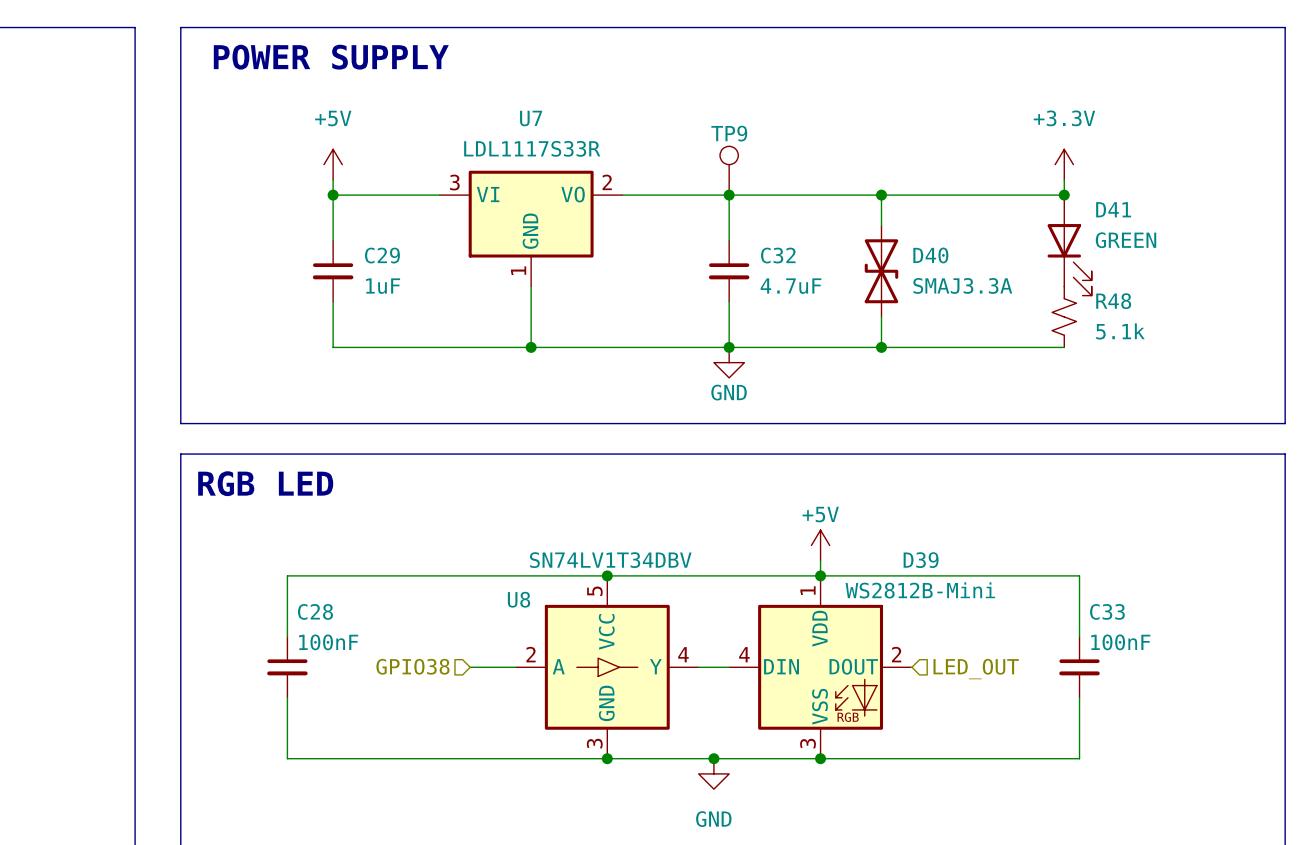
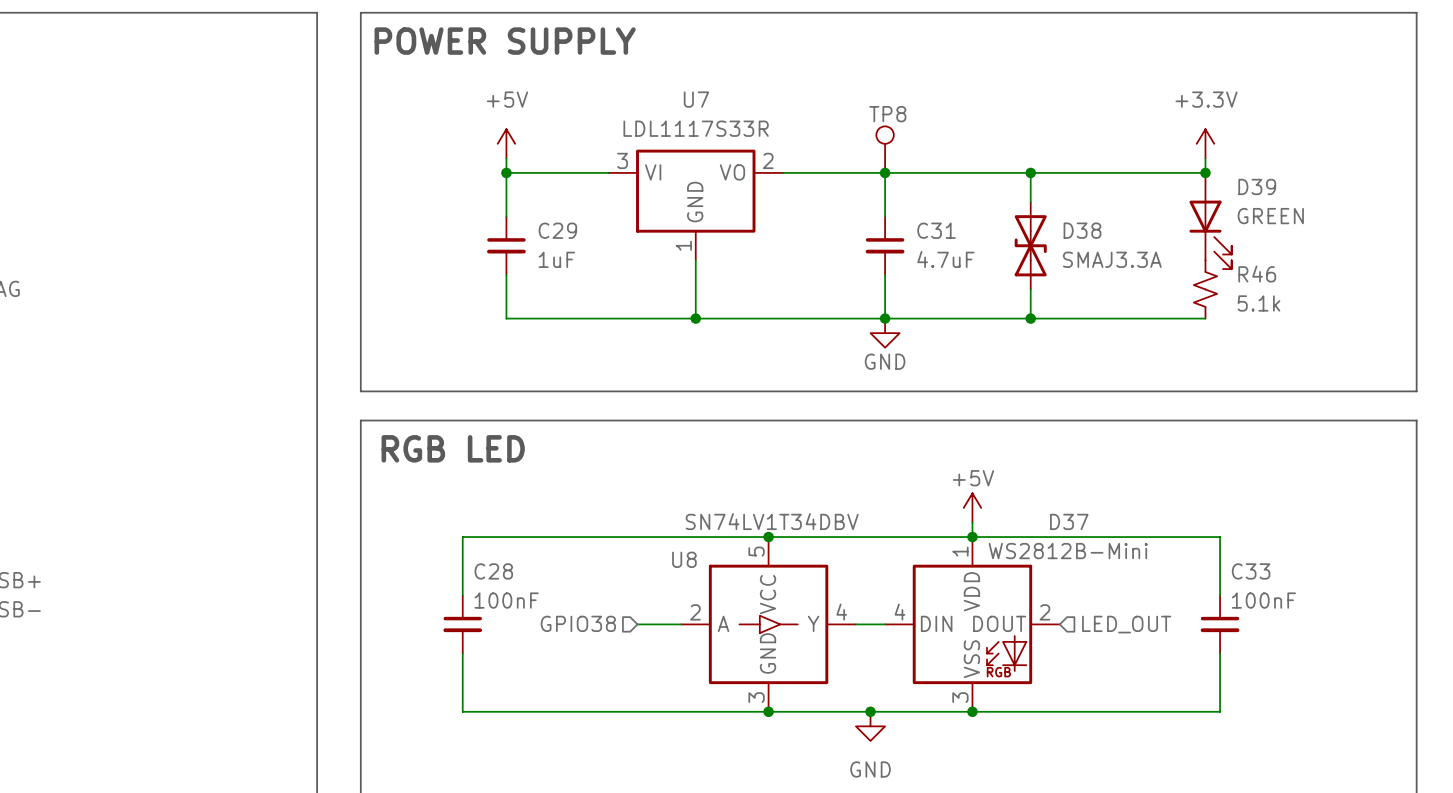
TP9 name: TP9 (729, 133) -> TP8 (887, 114)
D41 name: D41 (1113, 209) -> D39 (1257, 186)
C32 name: C32 (778, 255) -> C31 (936, 230)
D40 name: D40 (930, 255) -> D38 (1082, 230)
R48 name: R48 (1113, 301) -> R46 (1257, 274)
D39 name: D39 (921, 560) -> D37 (1069, 521)

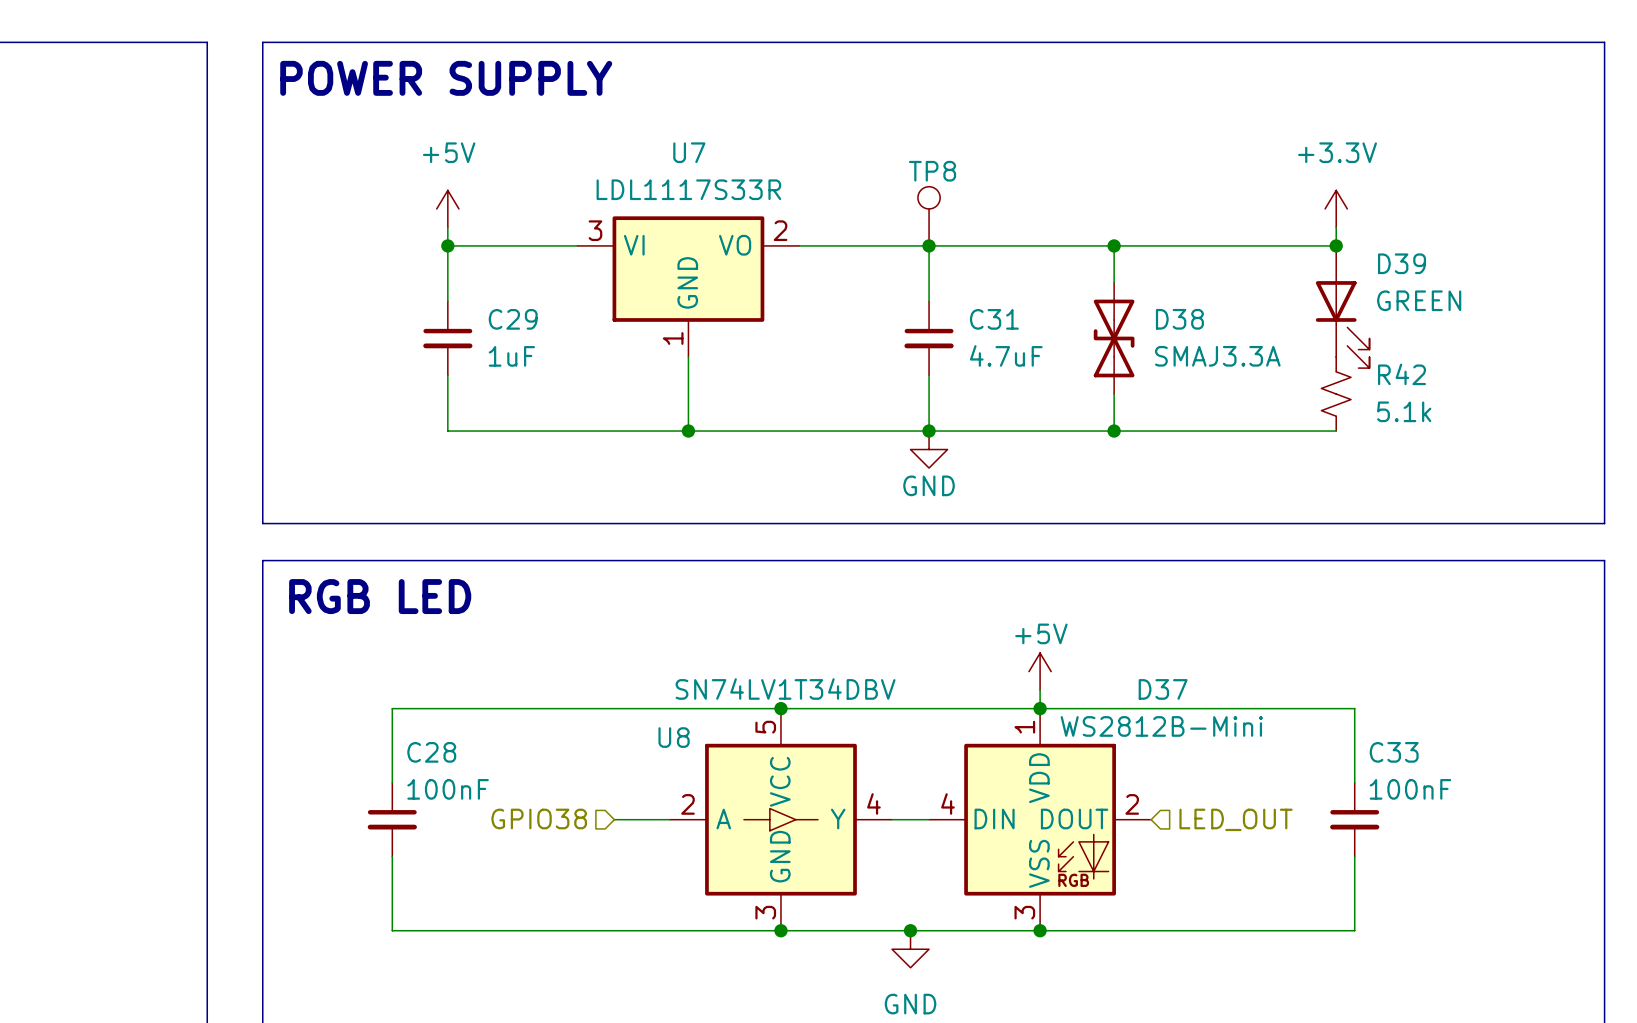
R46 name: R46 (1257, 274) -> R42 (1402, 374)

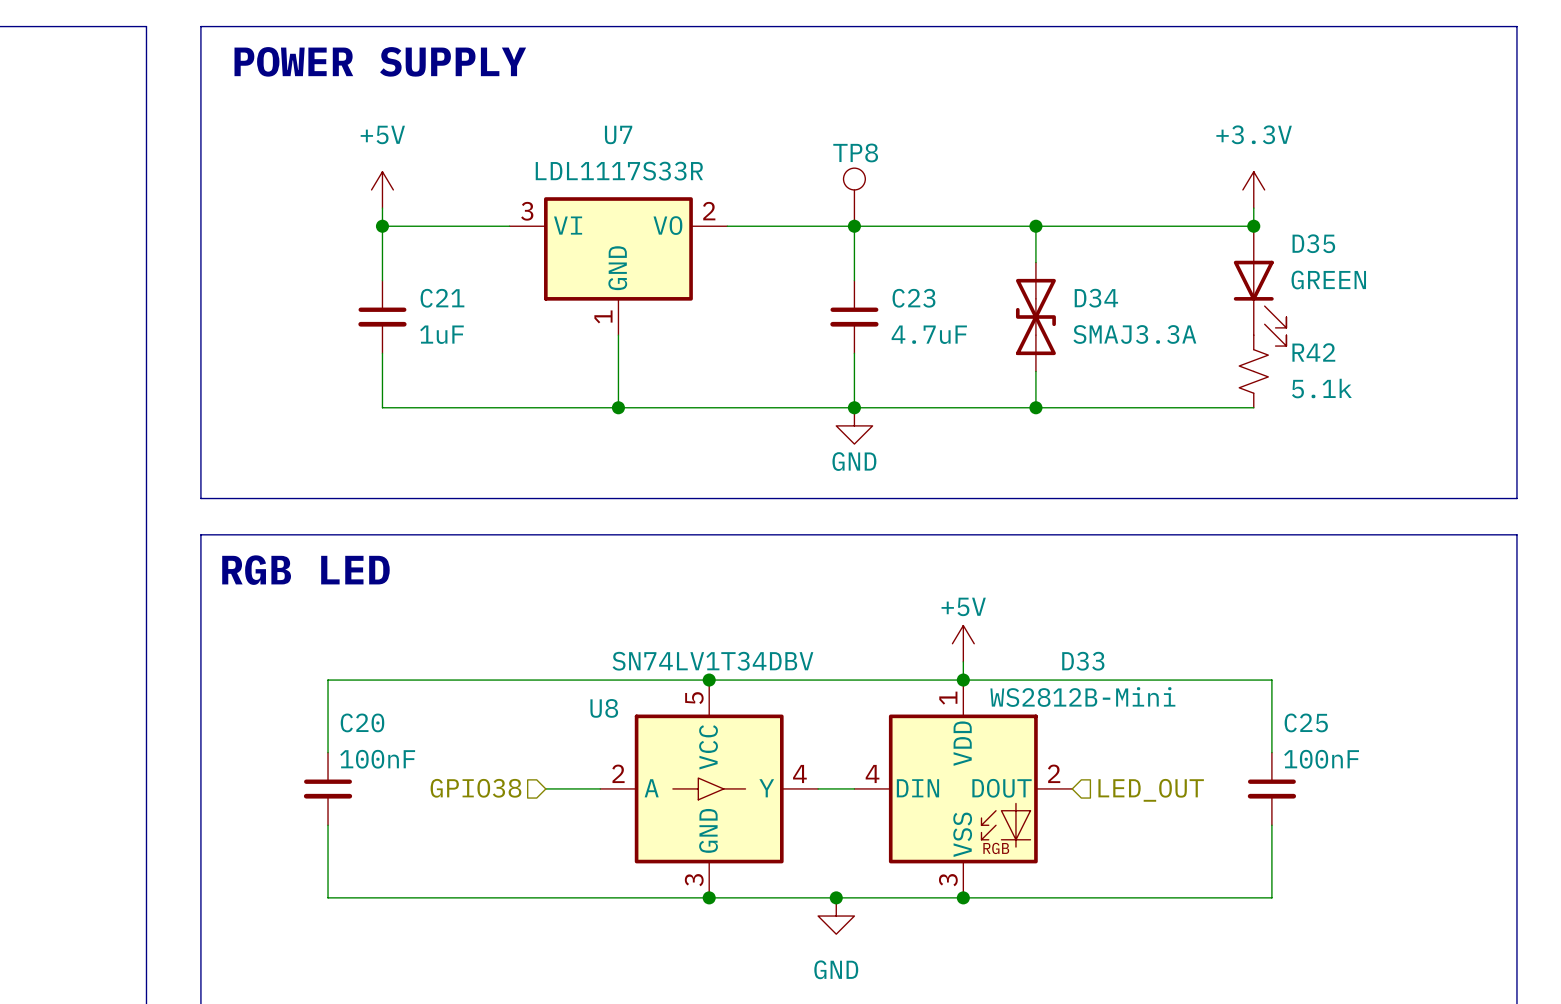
D39 name: D39 (1402, 263) -> D35 (1313, 243)
C29 name: C29 (513, 319) -> C21 (442, 298)
C31 name: C31 (994, 319) -> C23 (913, 298)
D38 name: D38 (1179, 319) -> D34 (1096, 298)
D37 name: D37 (1163, 689) -> D33 (1083, 661)
C28 name: C28 (431, 752) -> C20 (362, 722)
C33 name: C33 (1394, 752) -> C25 (1306, 722)

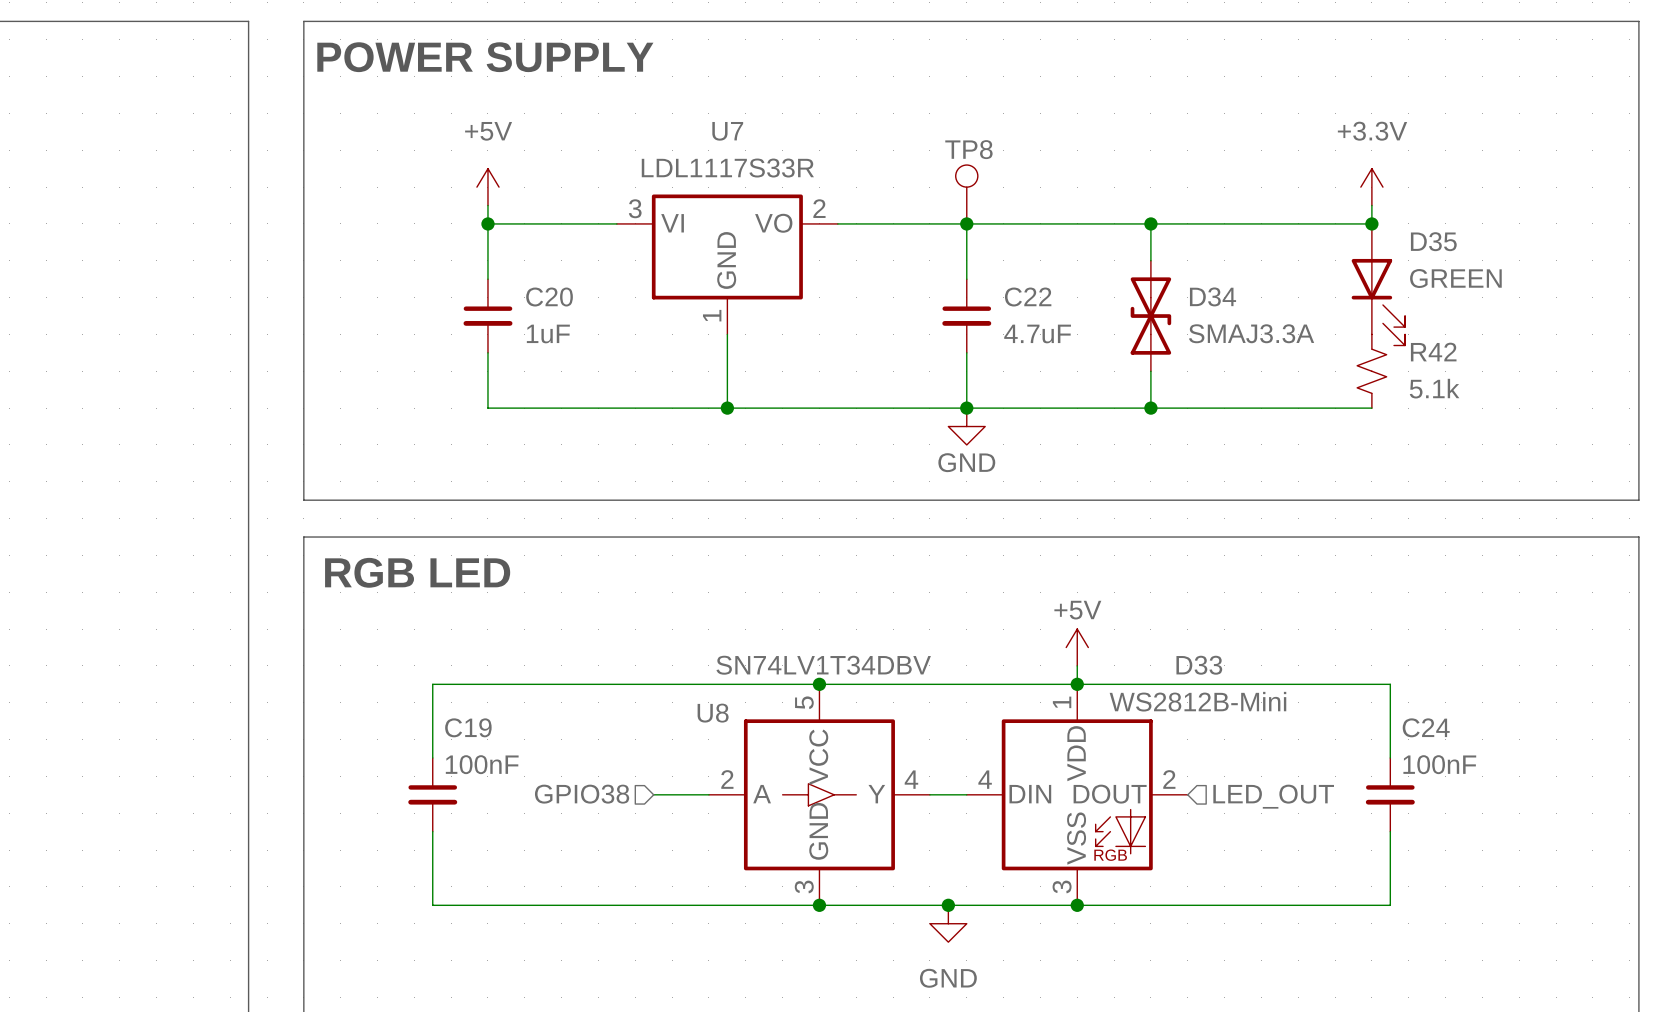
C21 name: C21 (442, 298) -> C20 (549, 297)
C23 name: C23 (913, 298) -> C22 (1028, 297)
C20 name: C20 (362, 722) -> C19 (468, 727)
C25 name: C25 (1306, 722) -> C24 (1426, 727)

